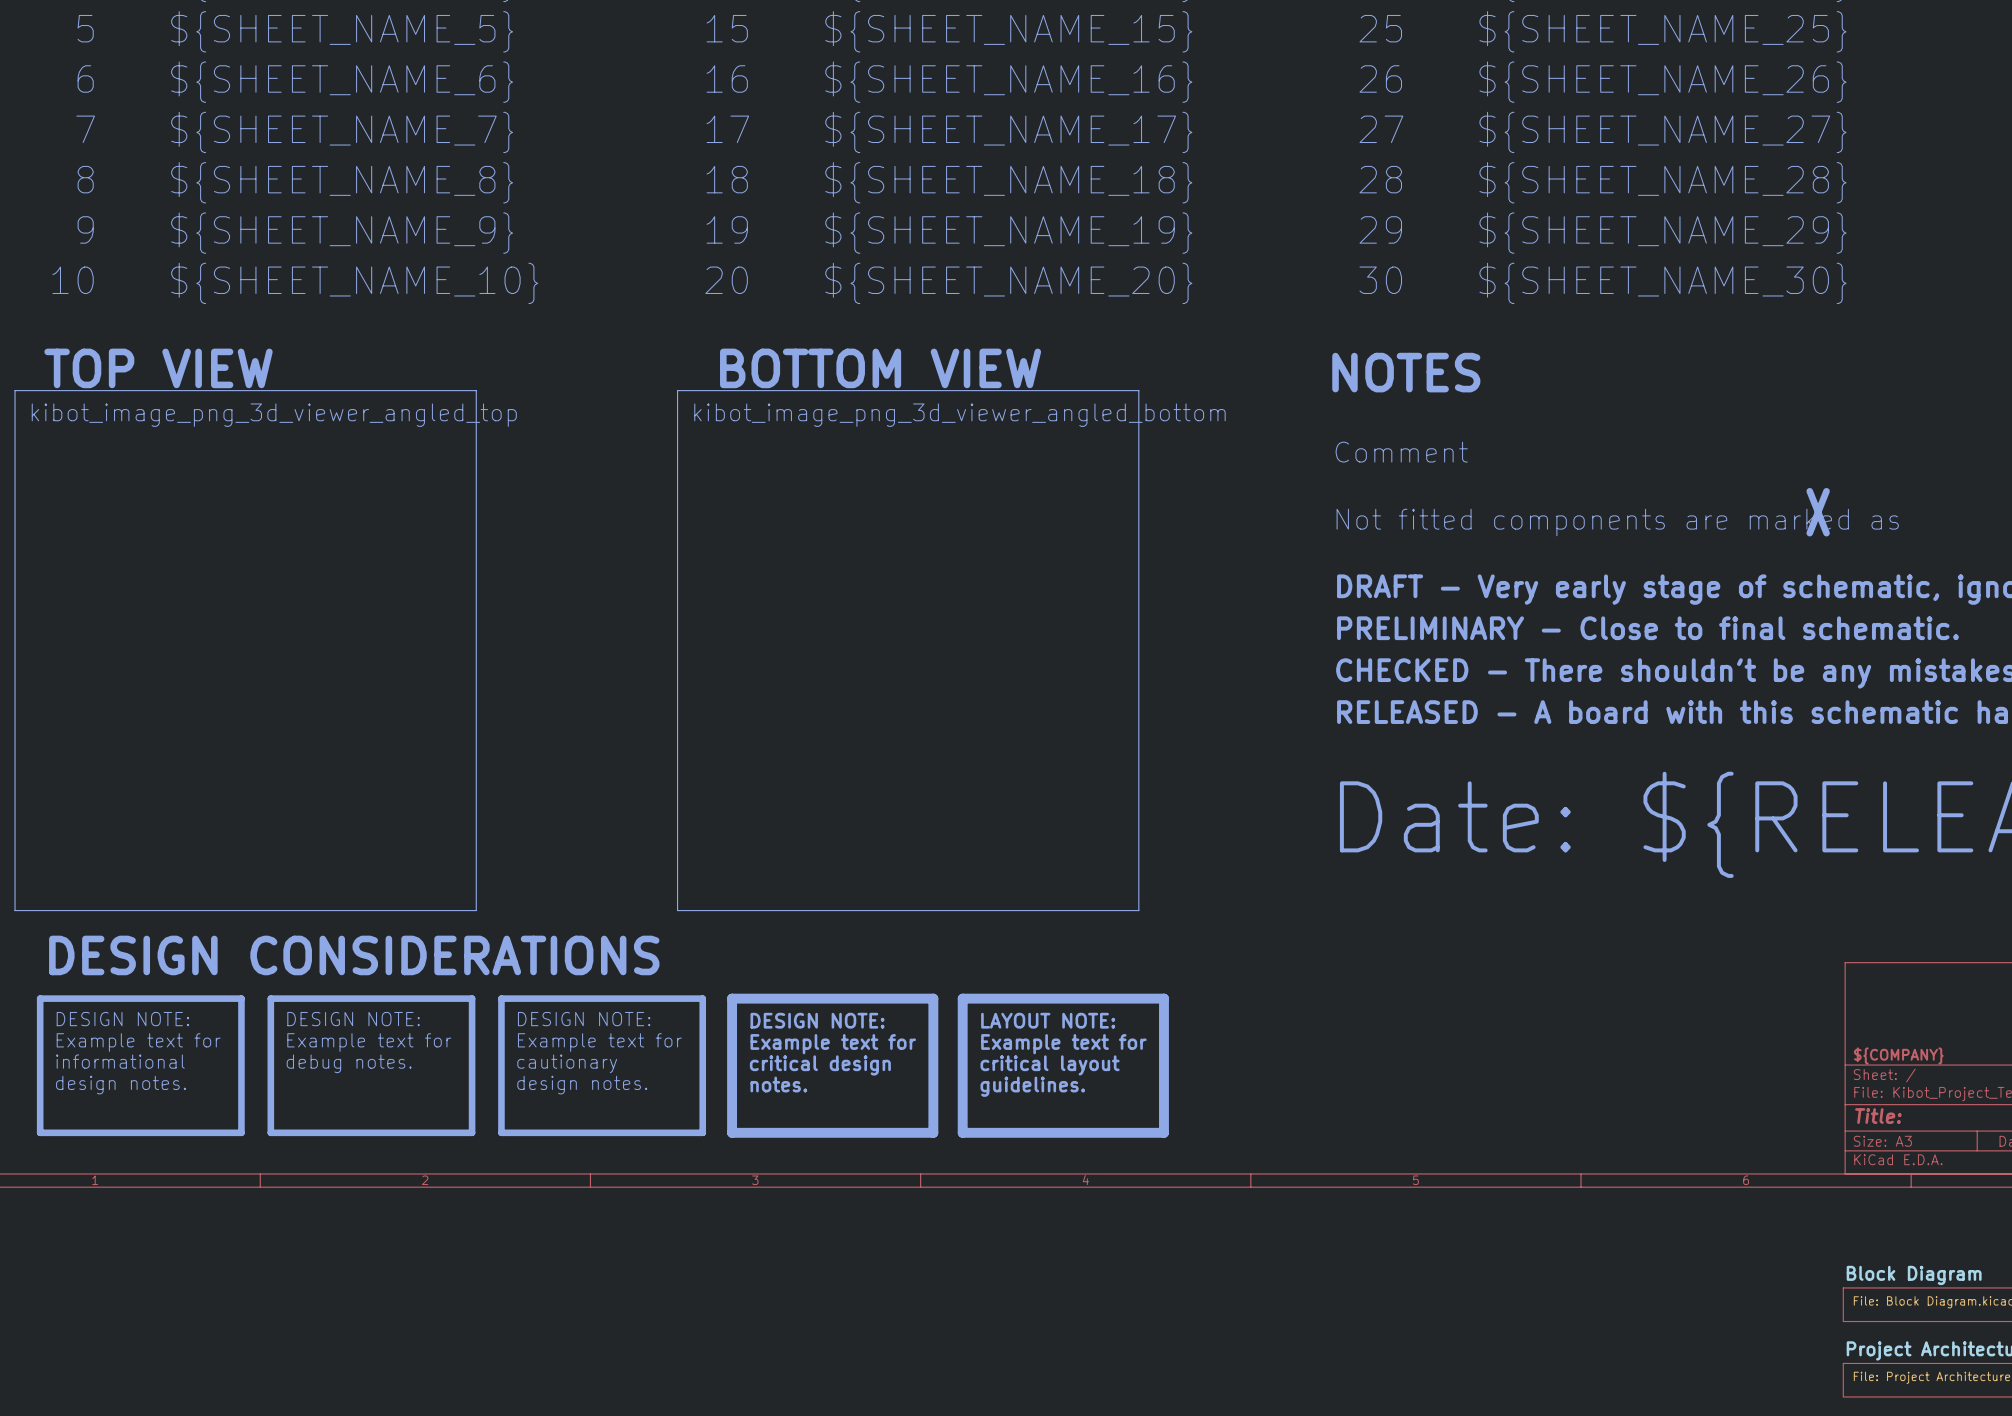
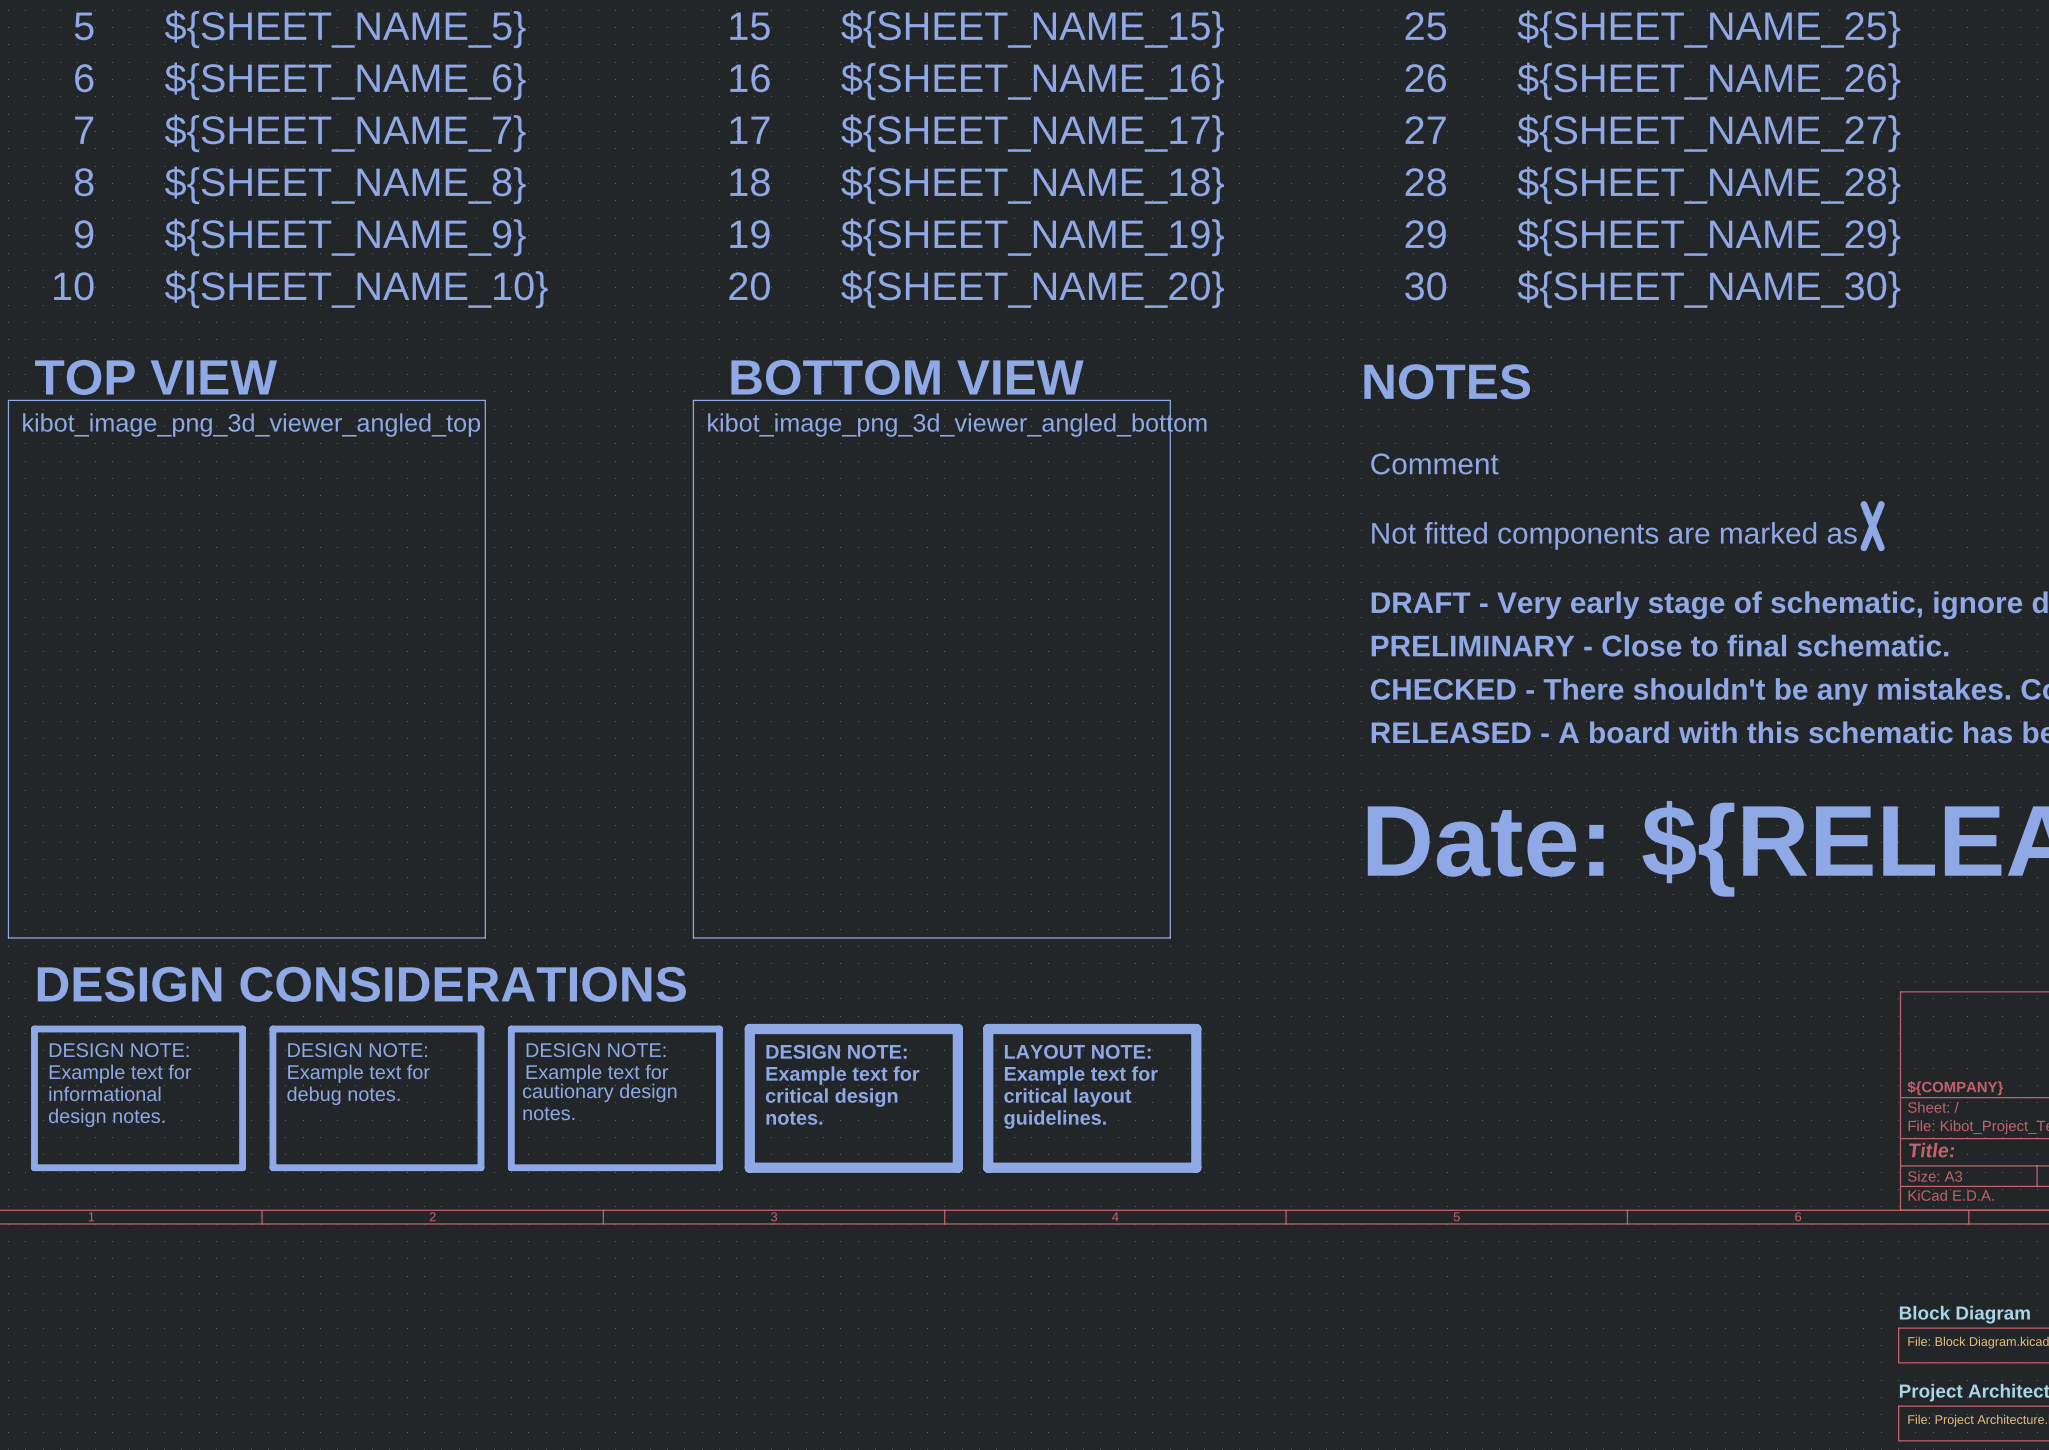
text: cautionary (567, 1063) -> cautionary design (599, 1092)
text: design notes. (582, 1085) -> notes. (548, 1113)

